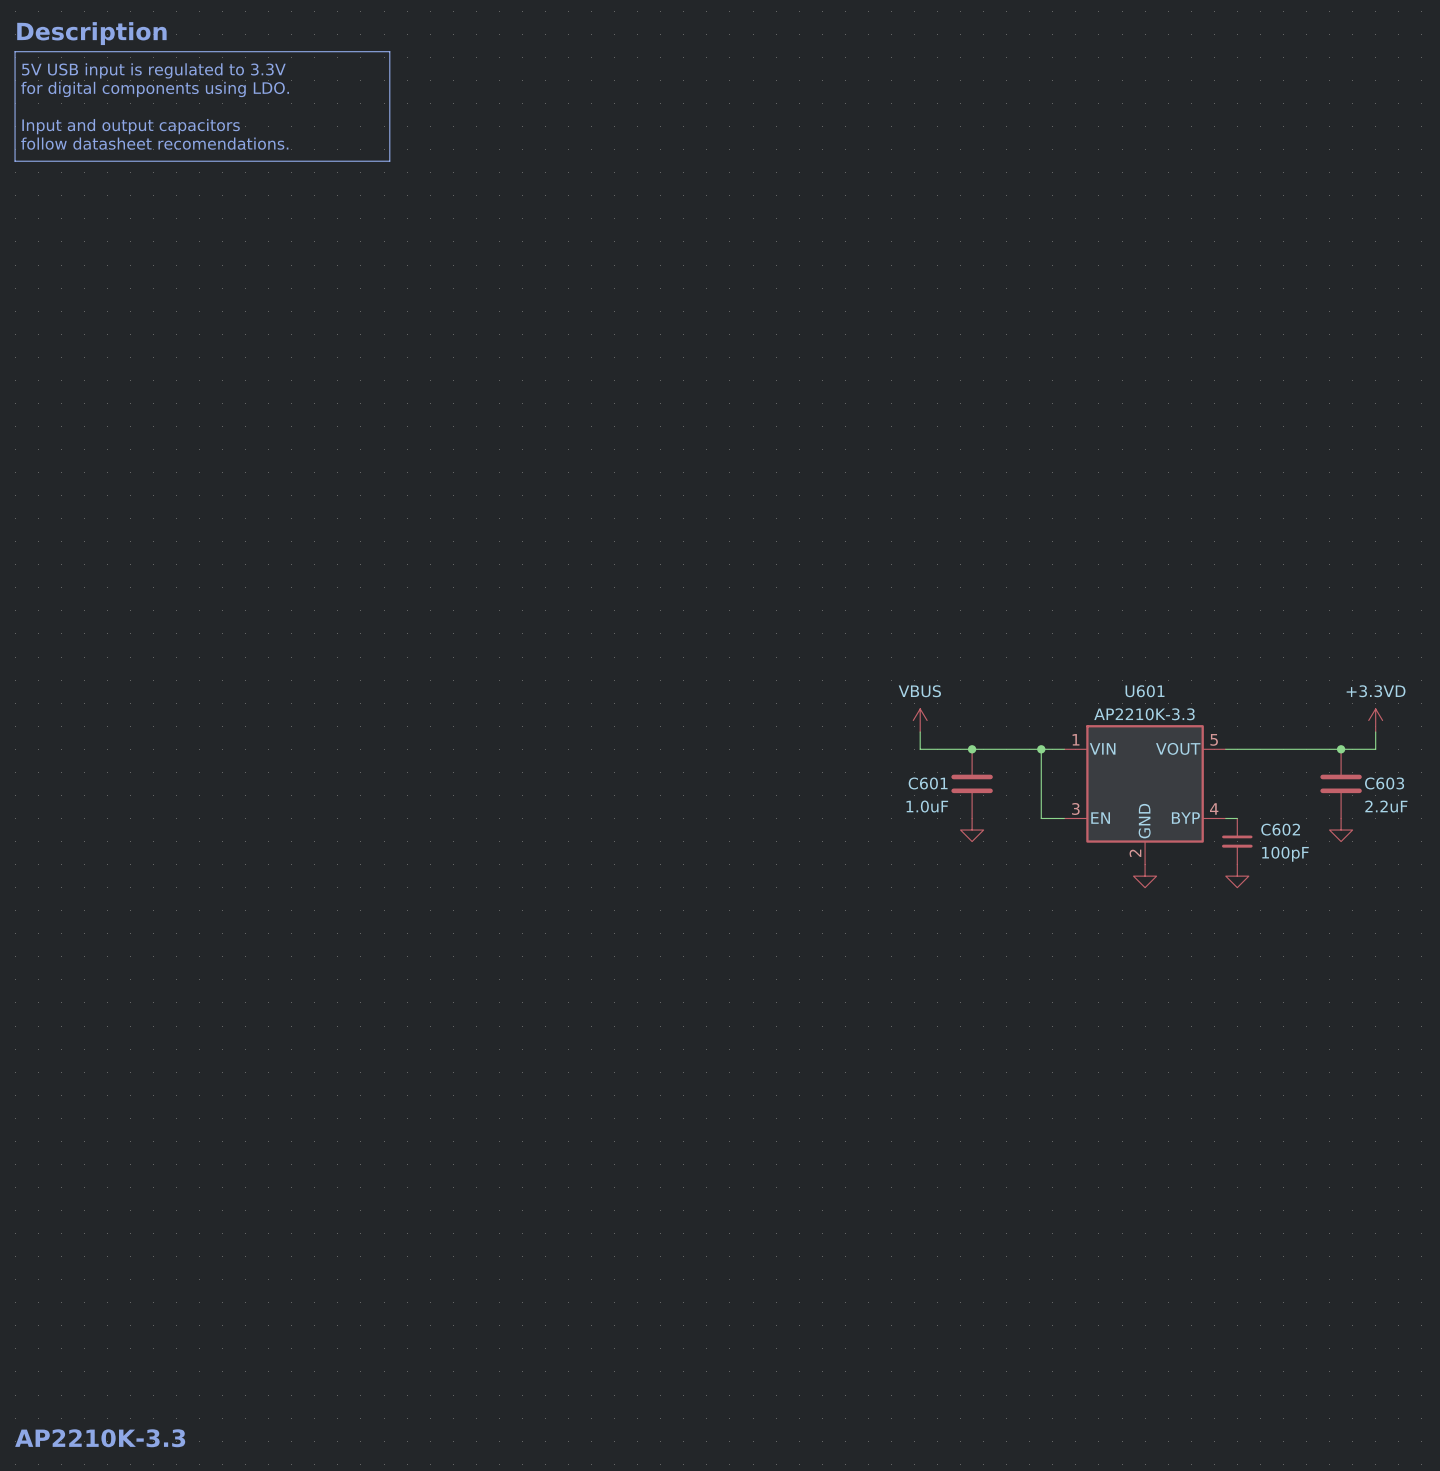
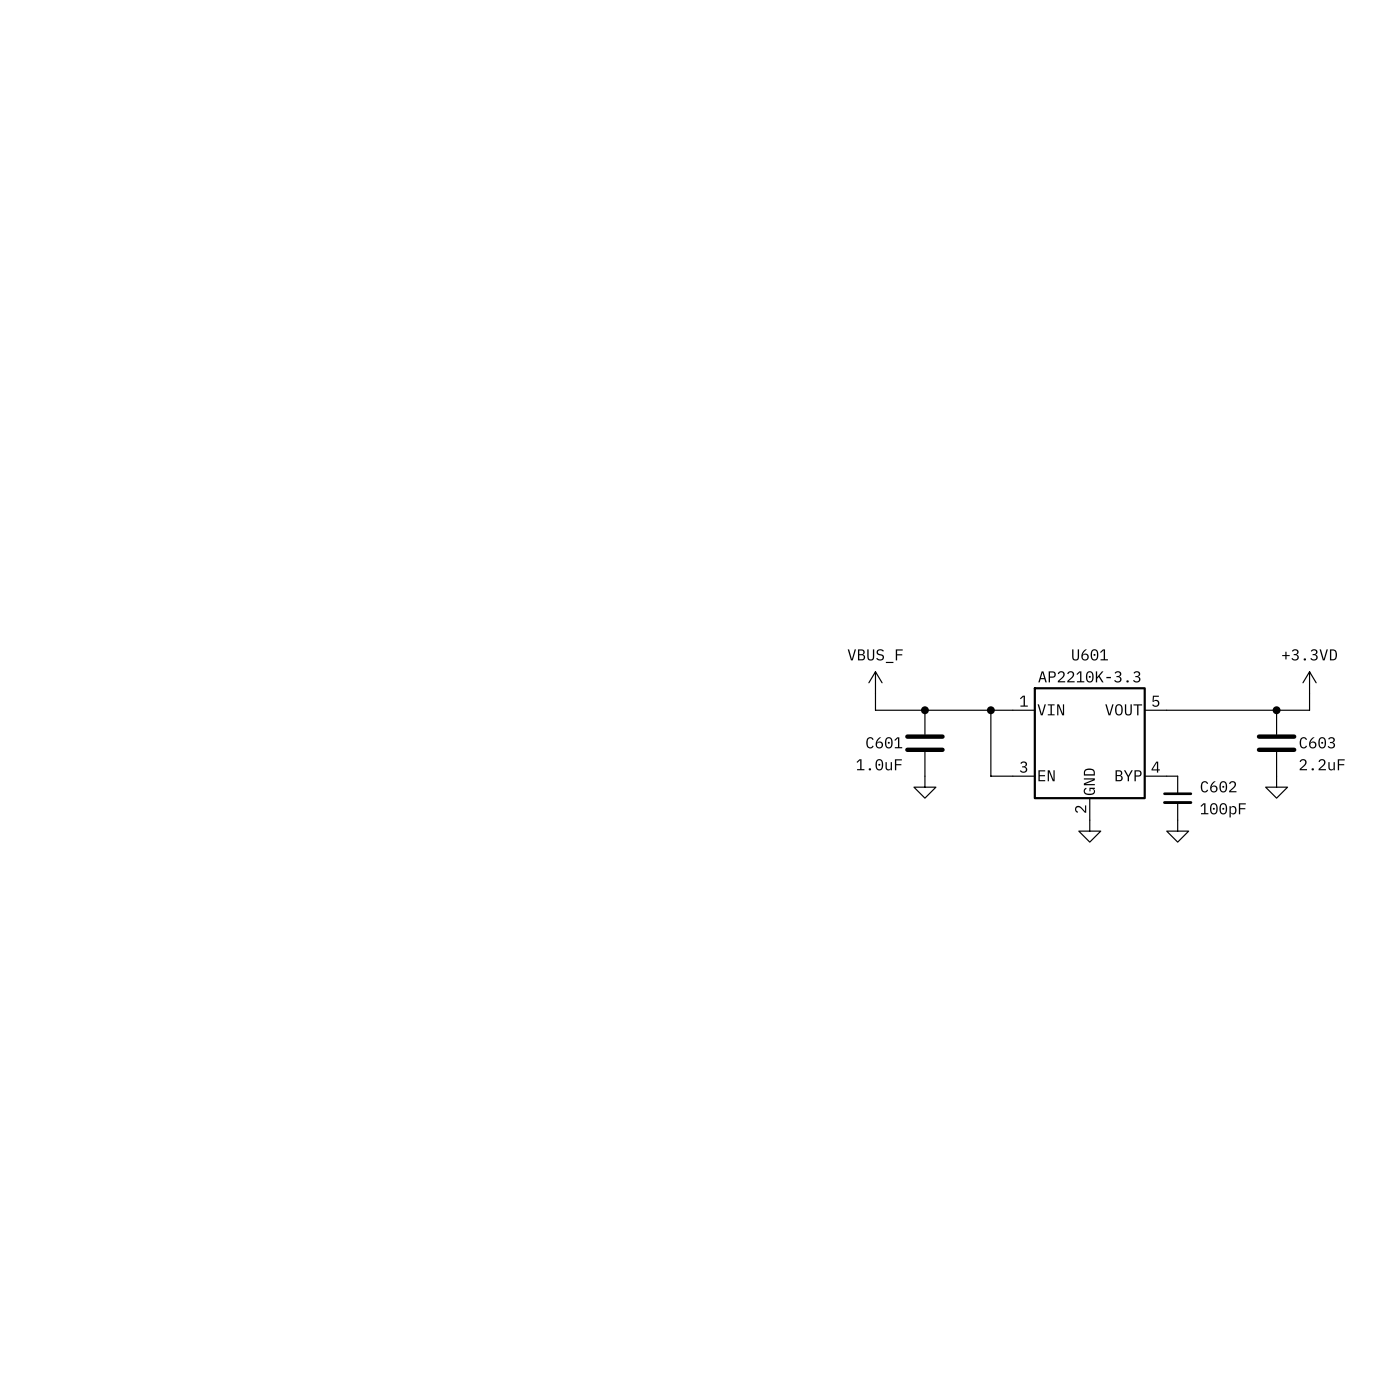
text: Description (91, 33) -> none
line: (15, 51) (389, 51) (389, 161) (15, 161) (15, 51) -> none
text: 5V USB input is regulated to 3.3V (153, 70) -> none
text: for digital components using LDO. (155, 89) -> none
text: Input and output capacitors (131, 126) -> none
text: follow datasheet recomendations. (154, 143) -> none
power symbol: VBUS (920, 720) -> VBUS_F (875, 682)
text: AP2210K-3.3 (100, 1438) -> none

